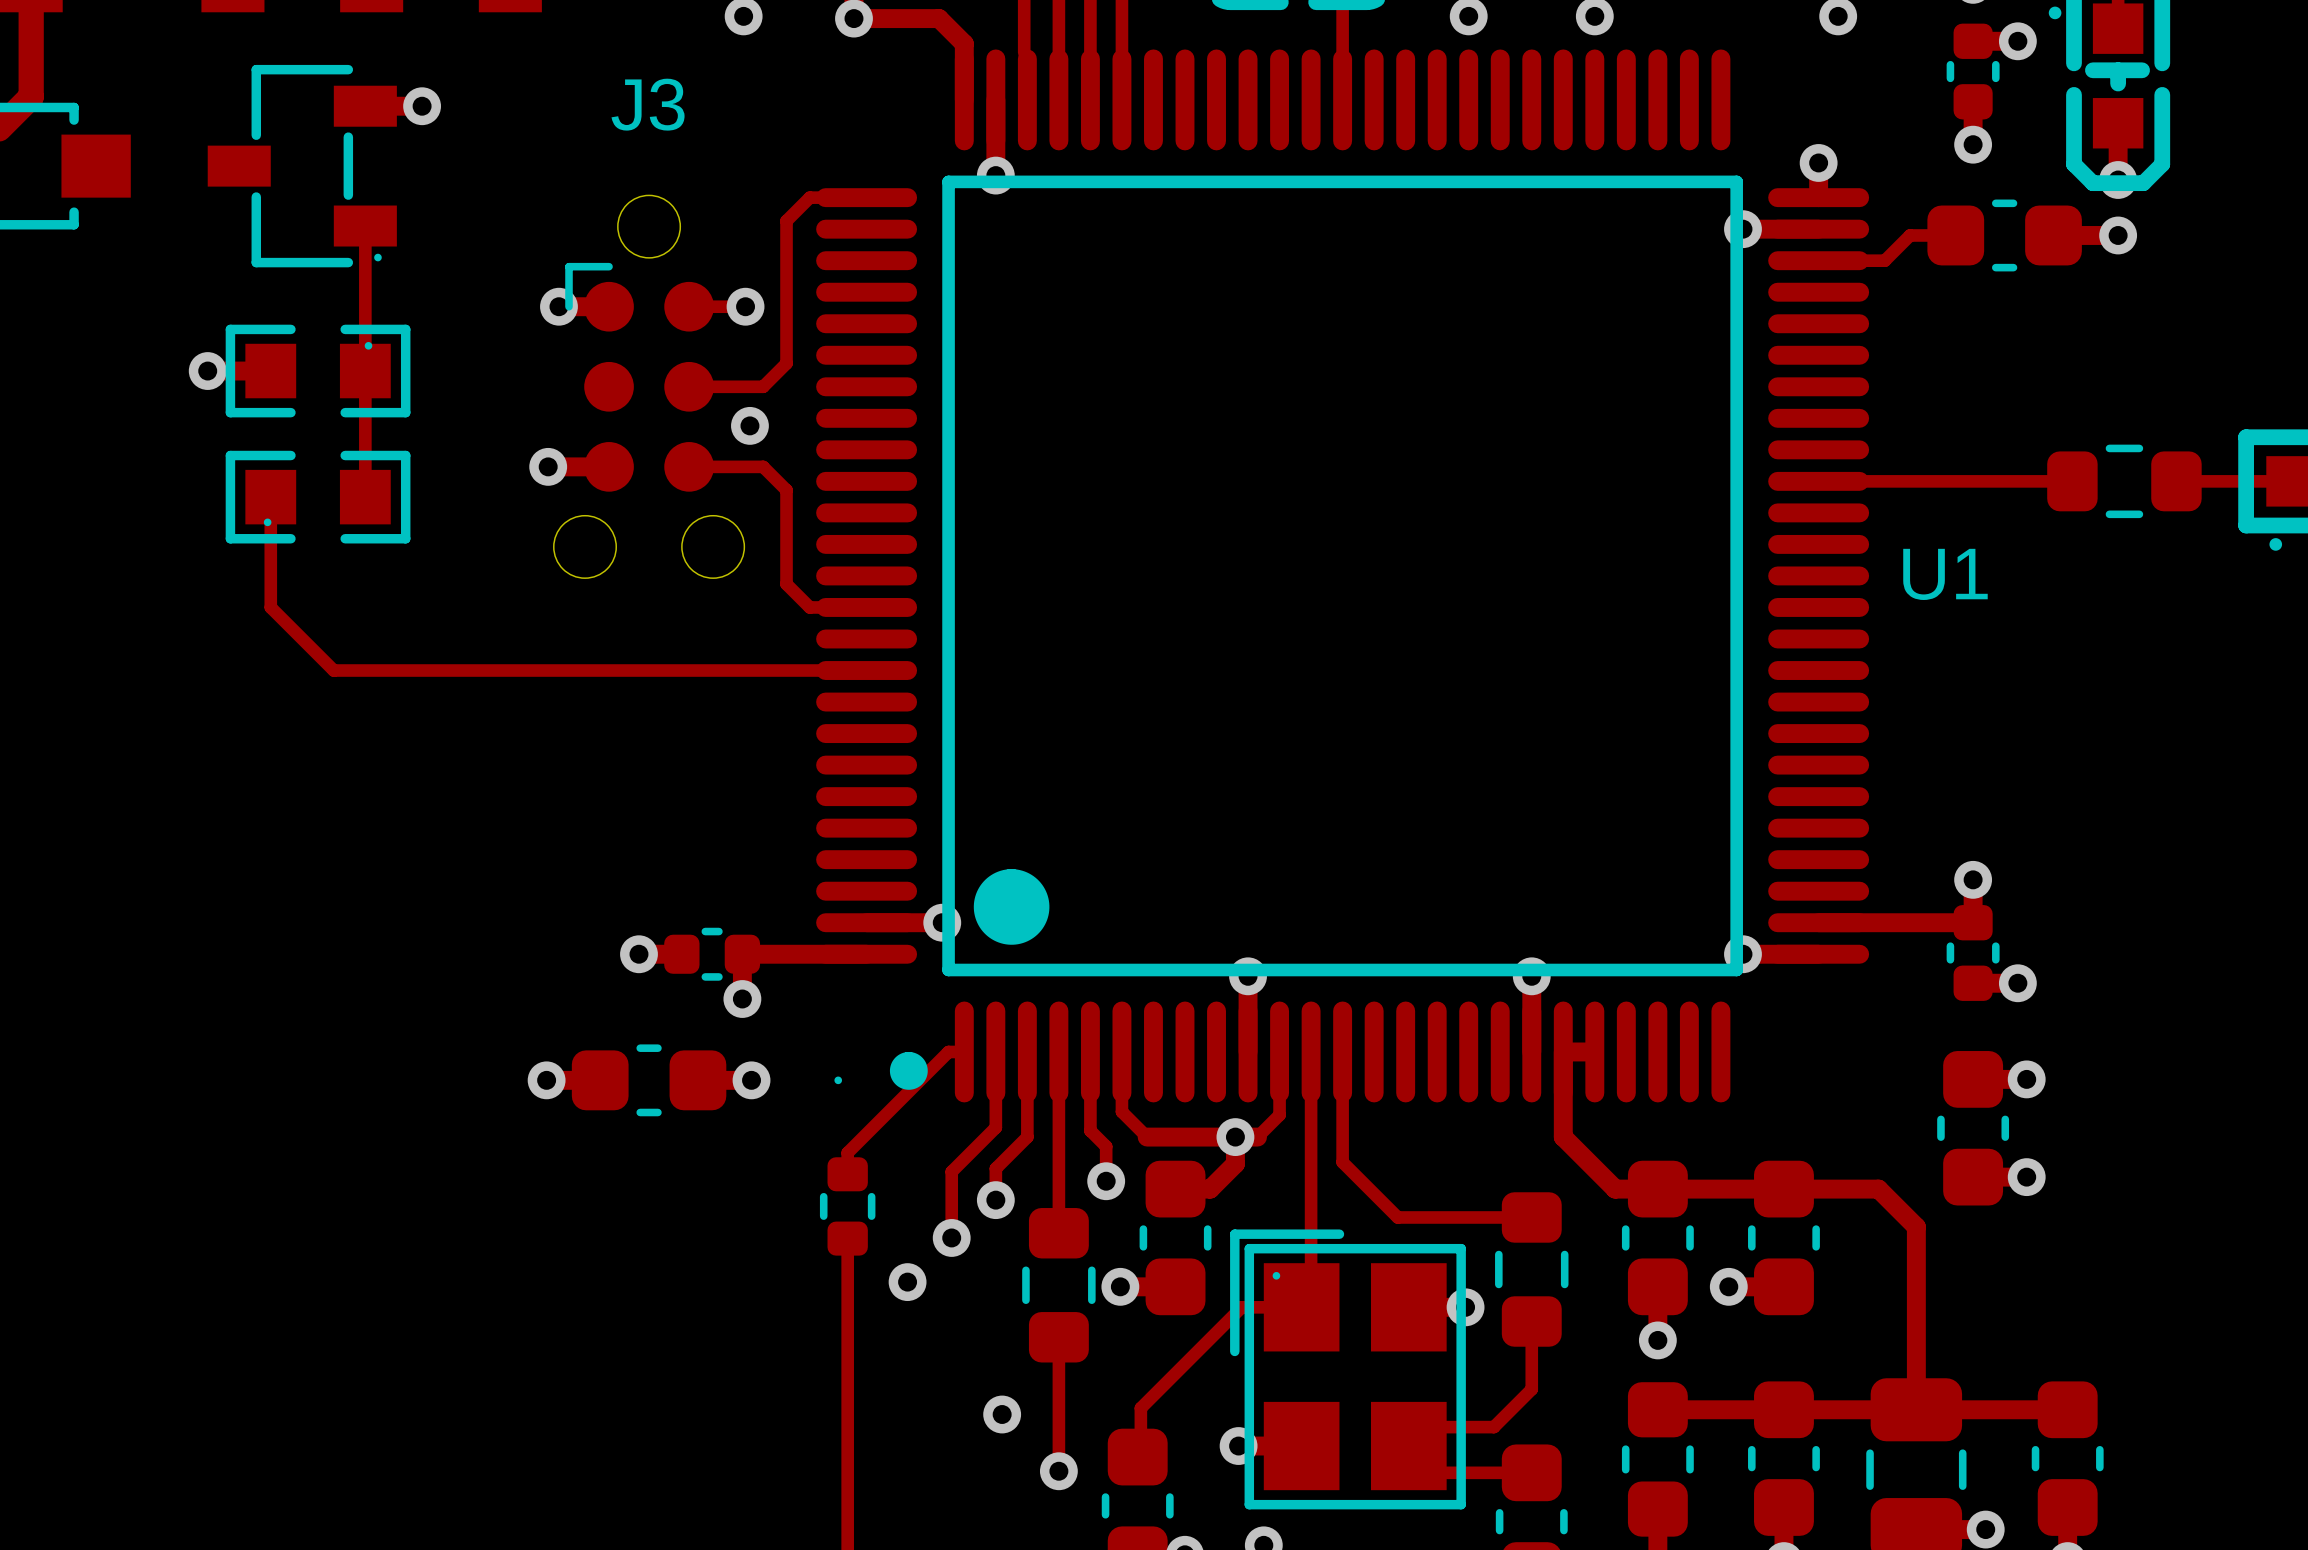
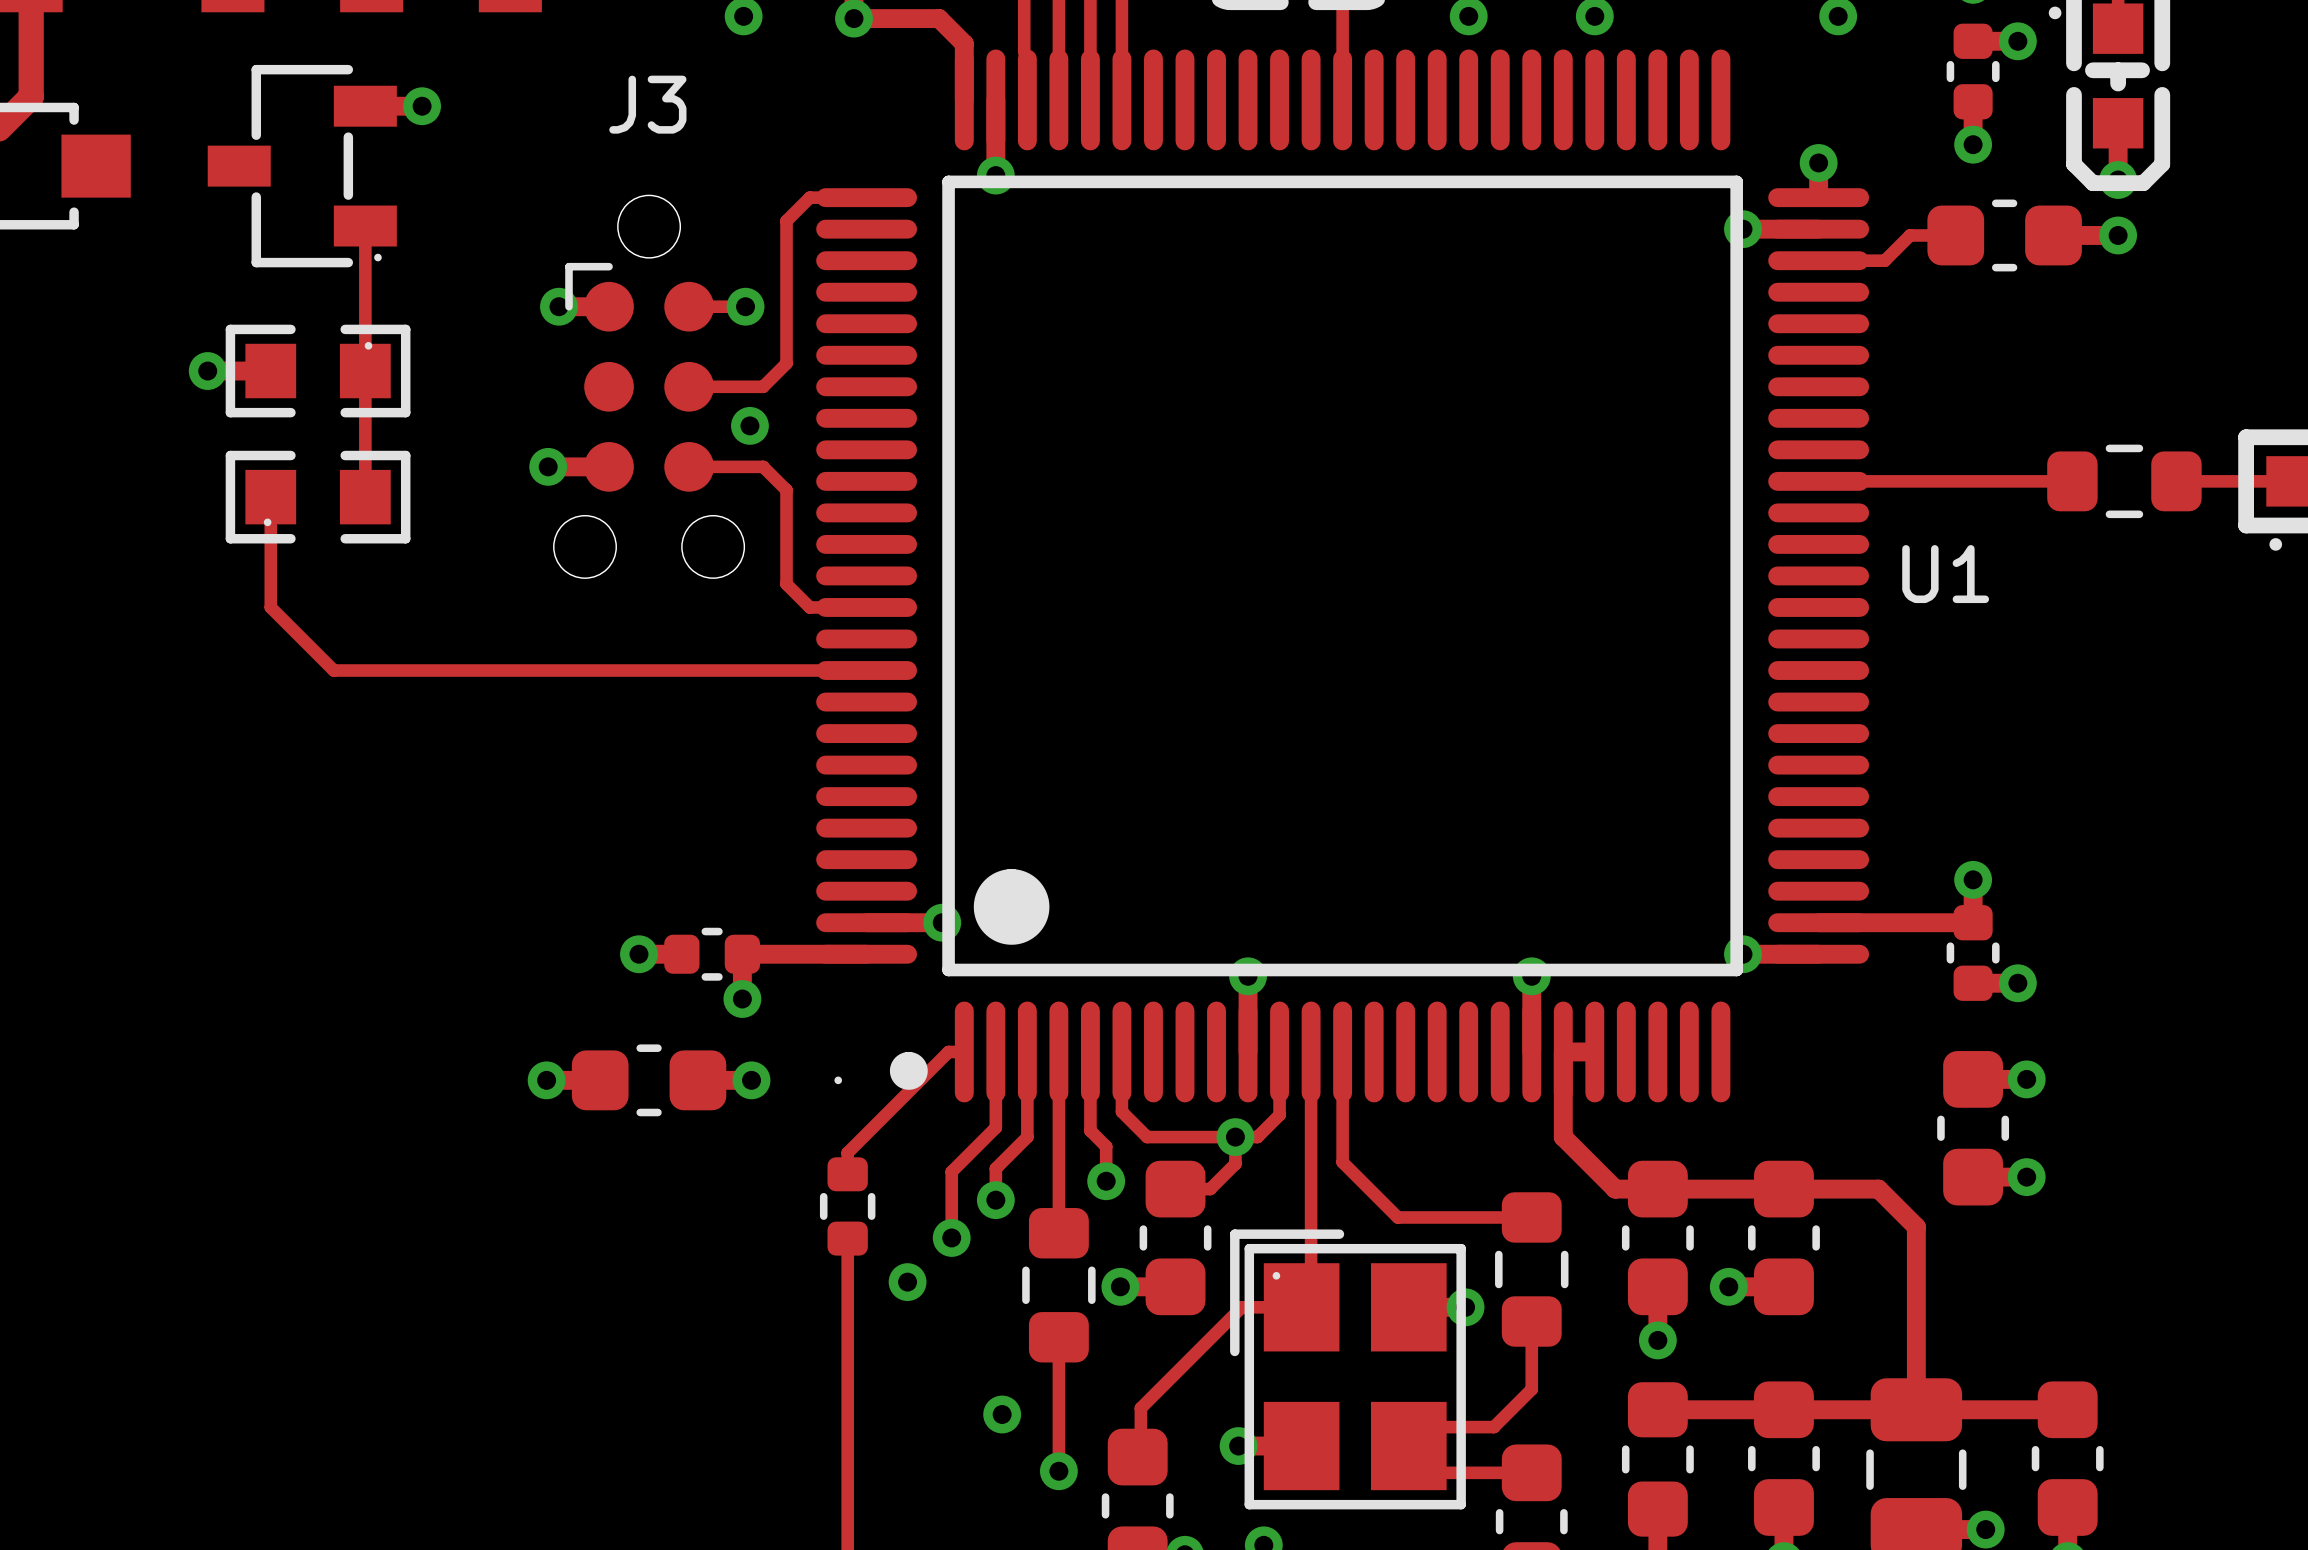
track width: thick (1147, 1137) (1257, 1137) -> thin (1147, 1137) (1257, 1137)
track width: thick (1235, 1137) (1235, 1163) (1210, 1189) (1175, 1189) -> thin (1235, 1137) (1235, 1163) (1210, 1189) (1175, 1189)

